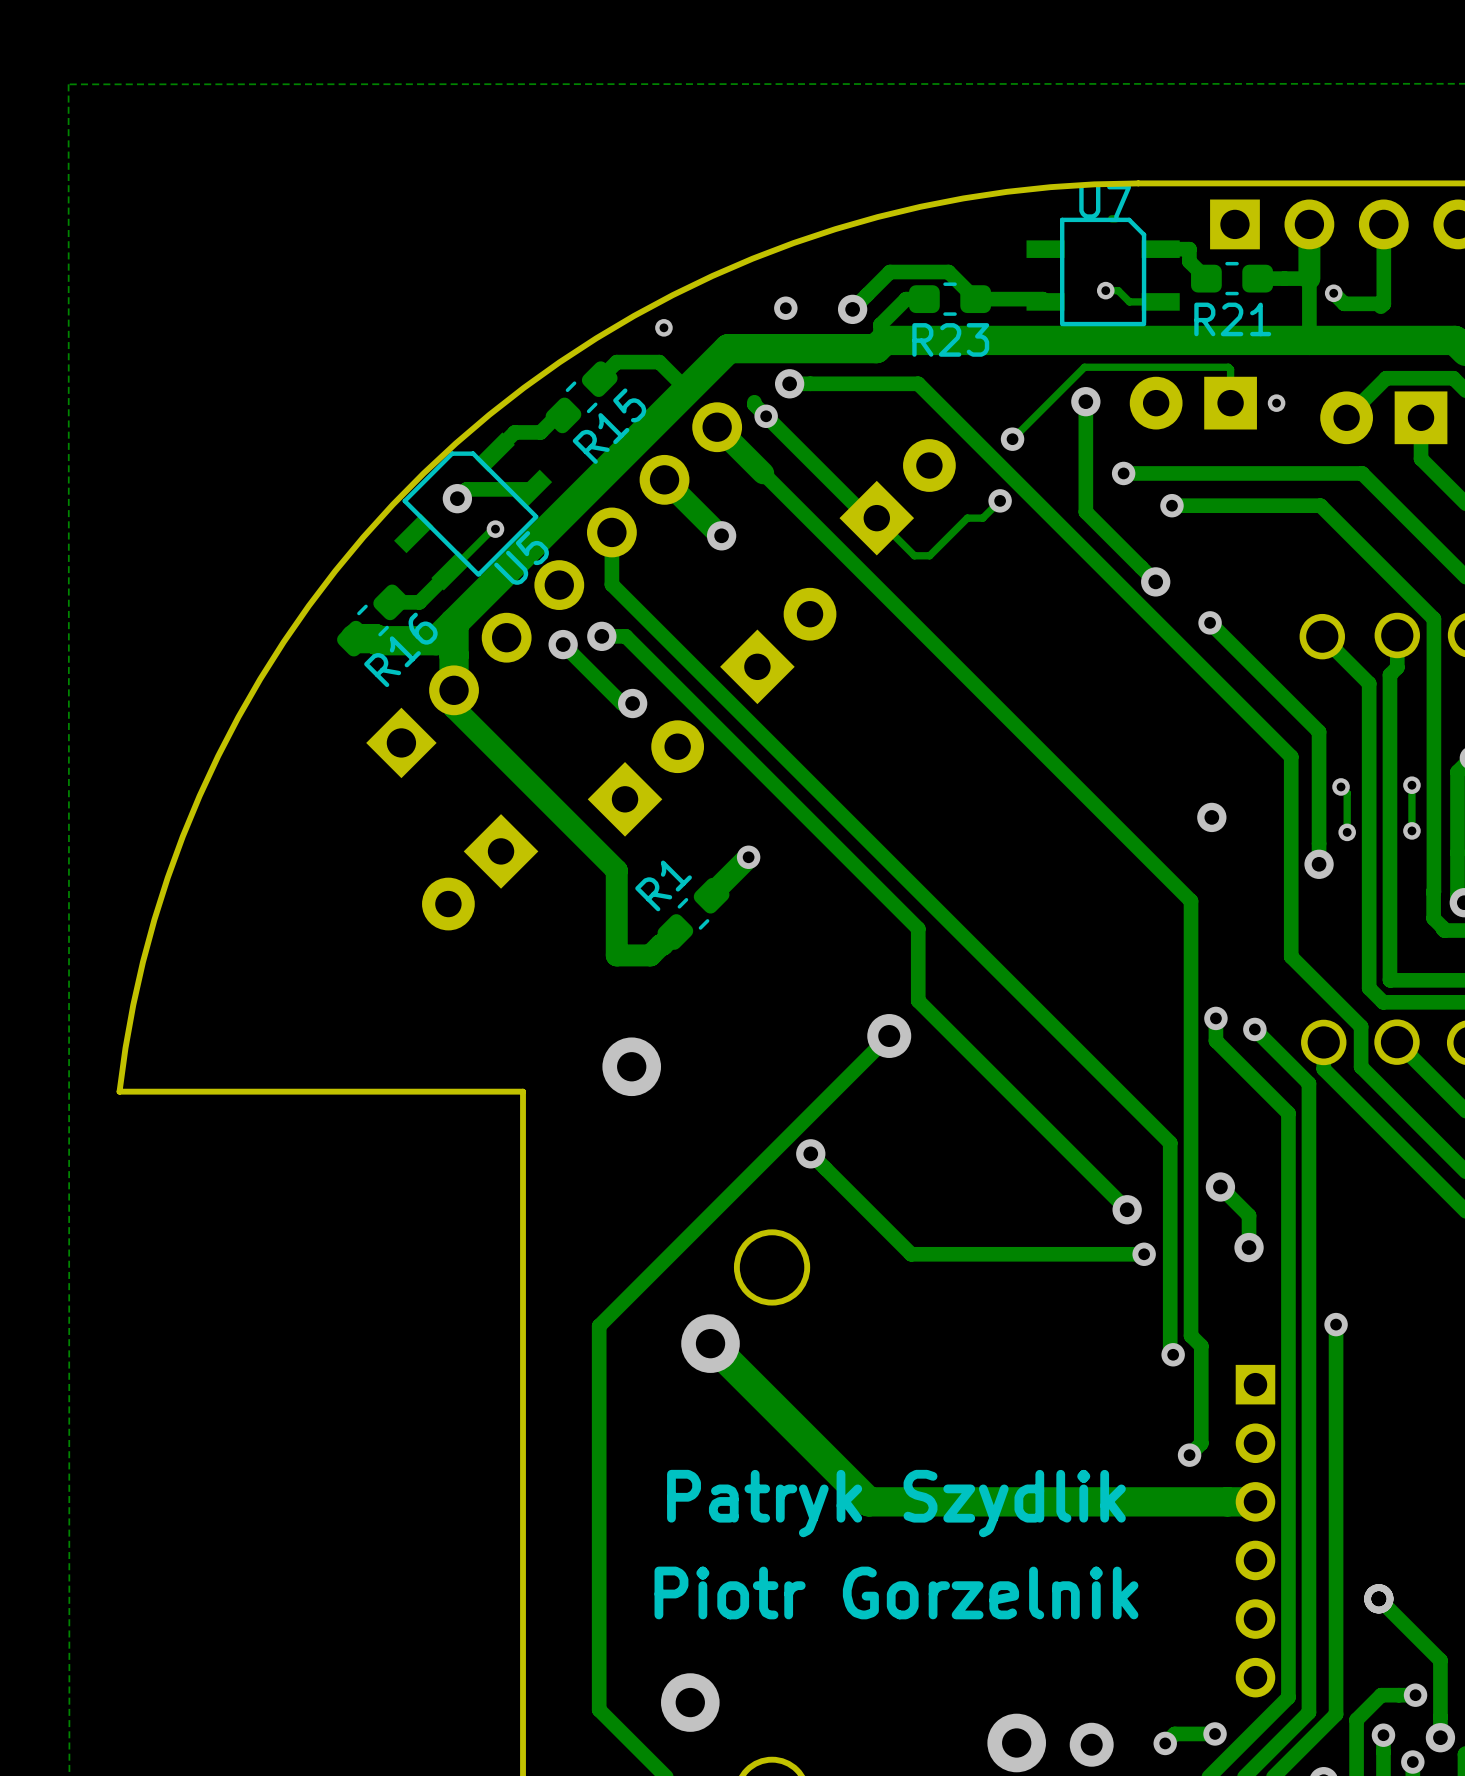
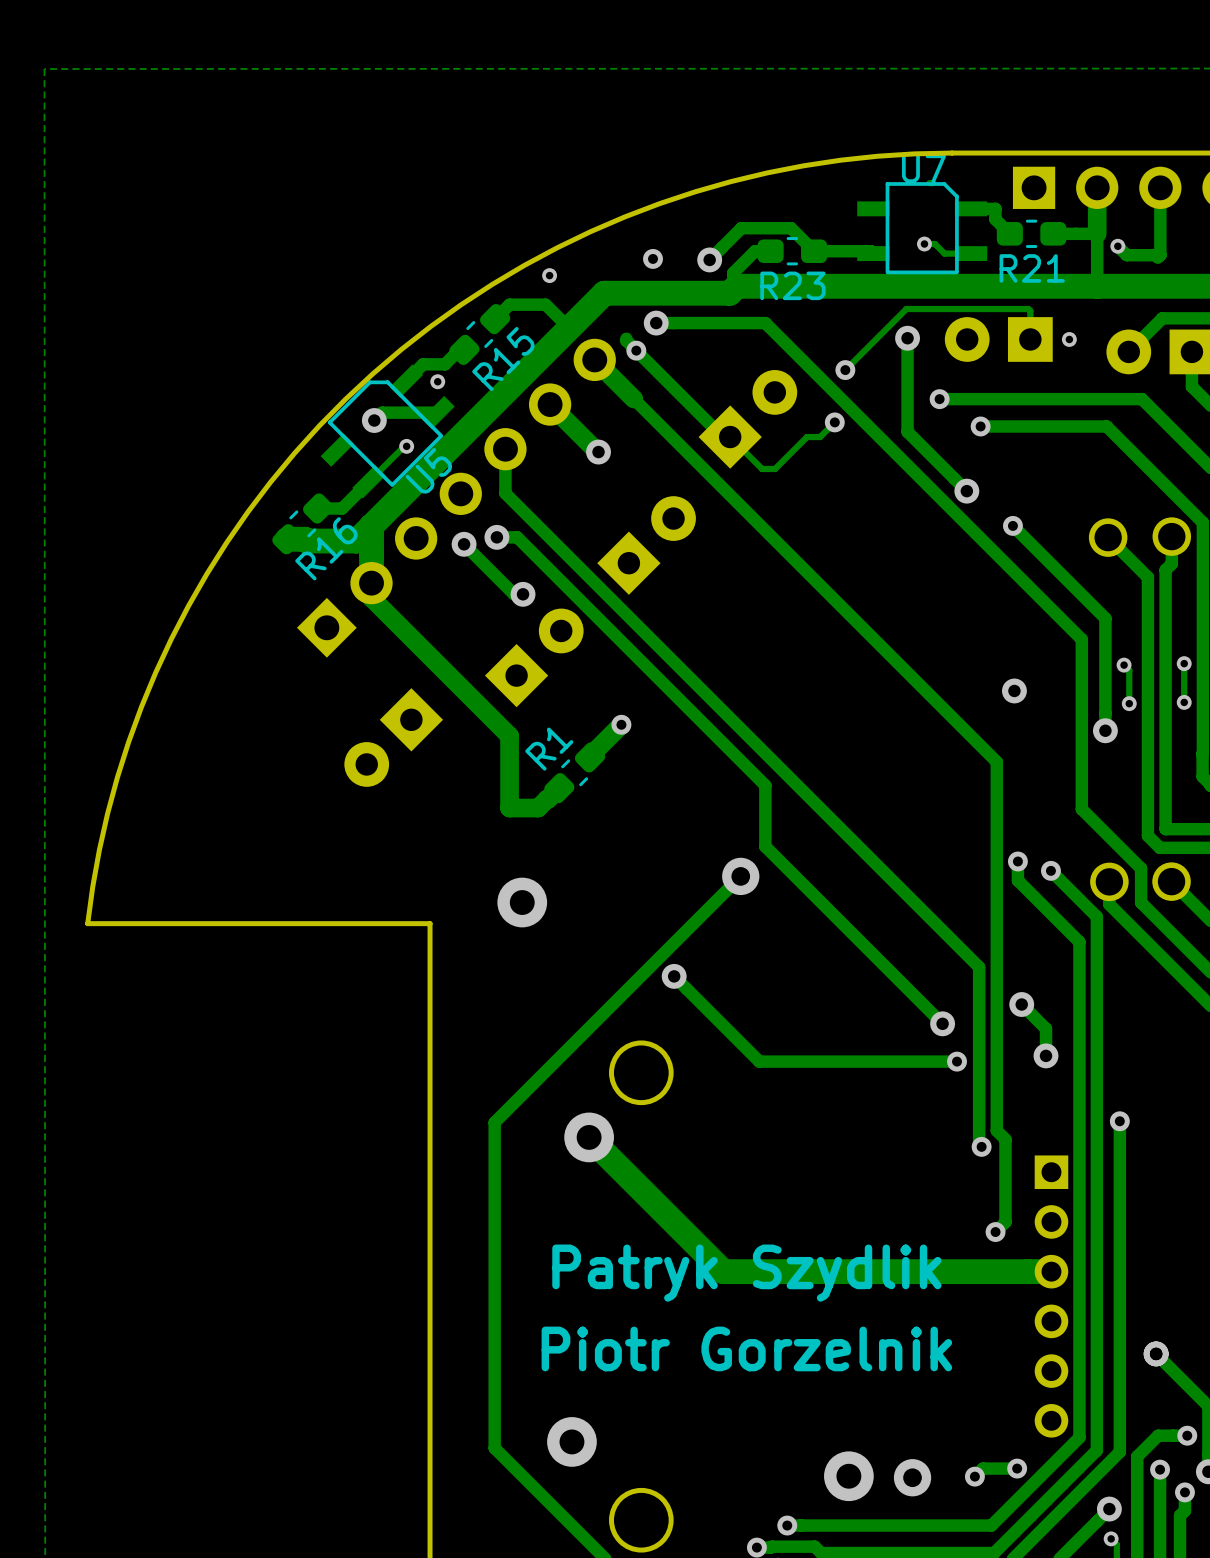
via: none -> (437, 381)

